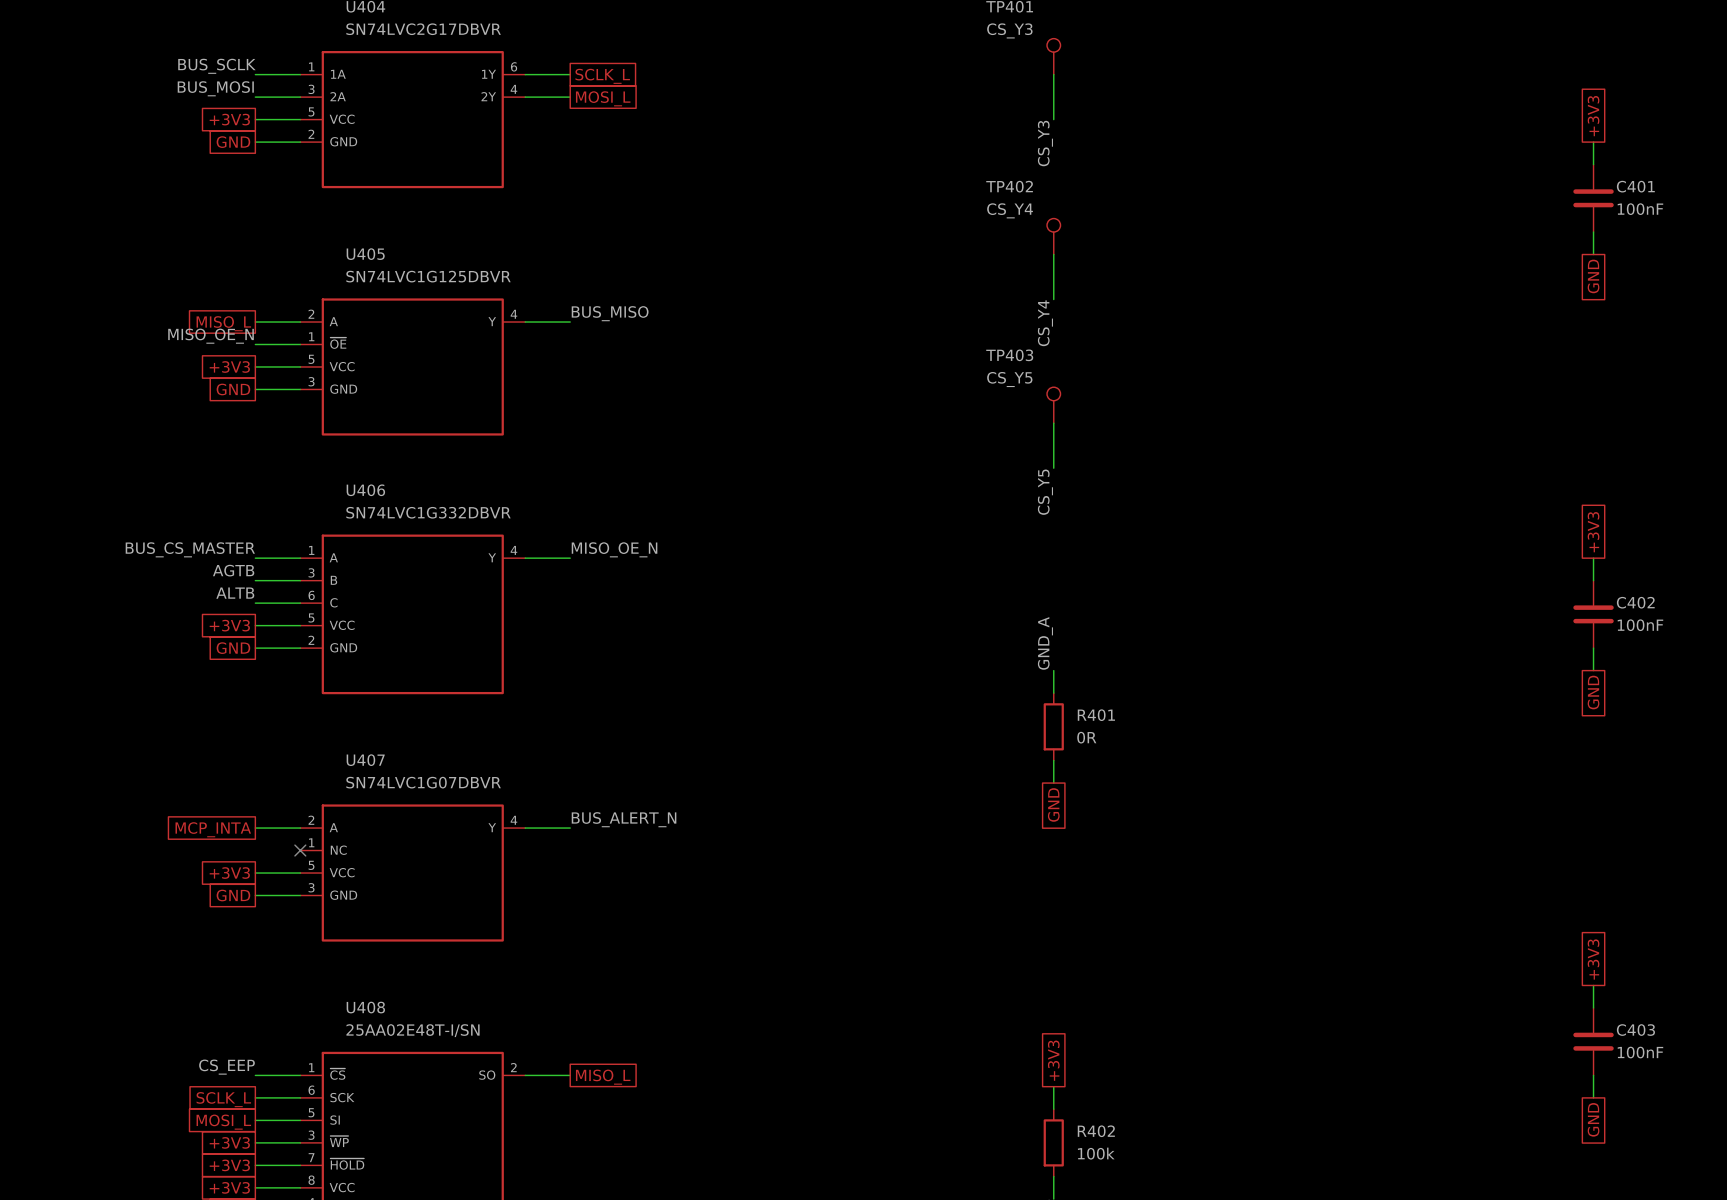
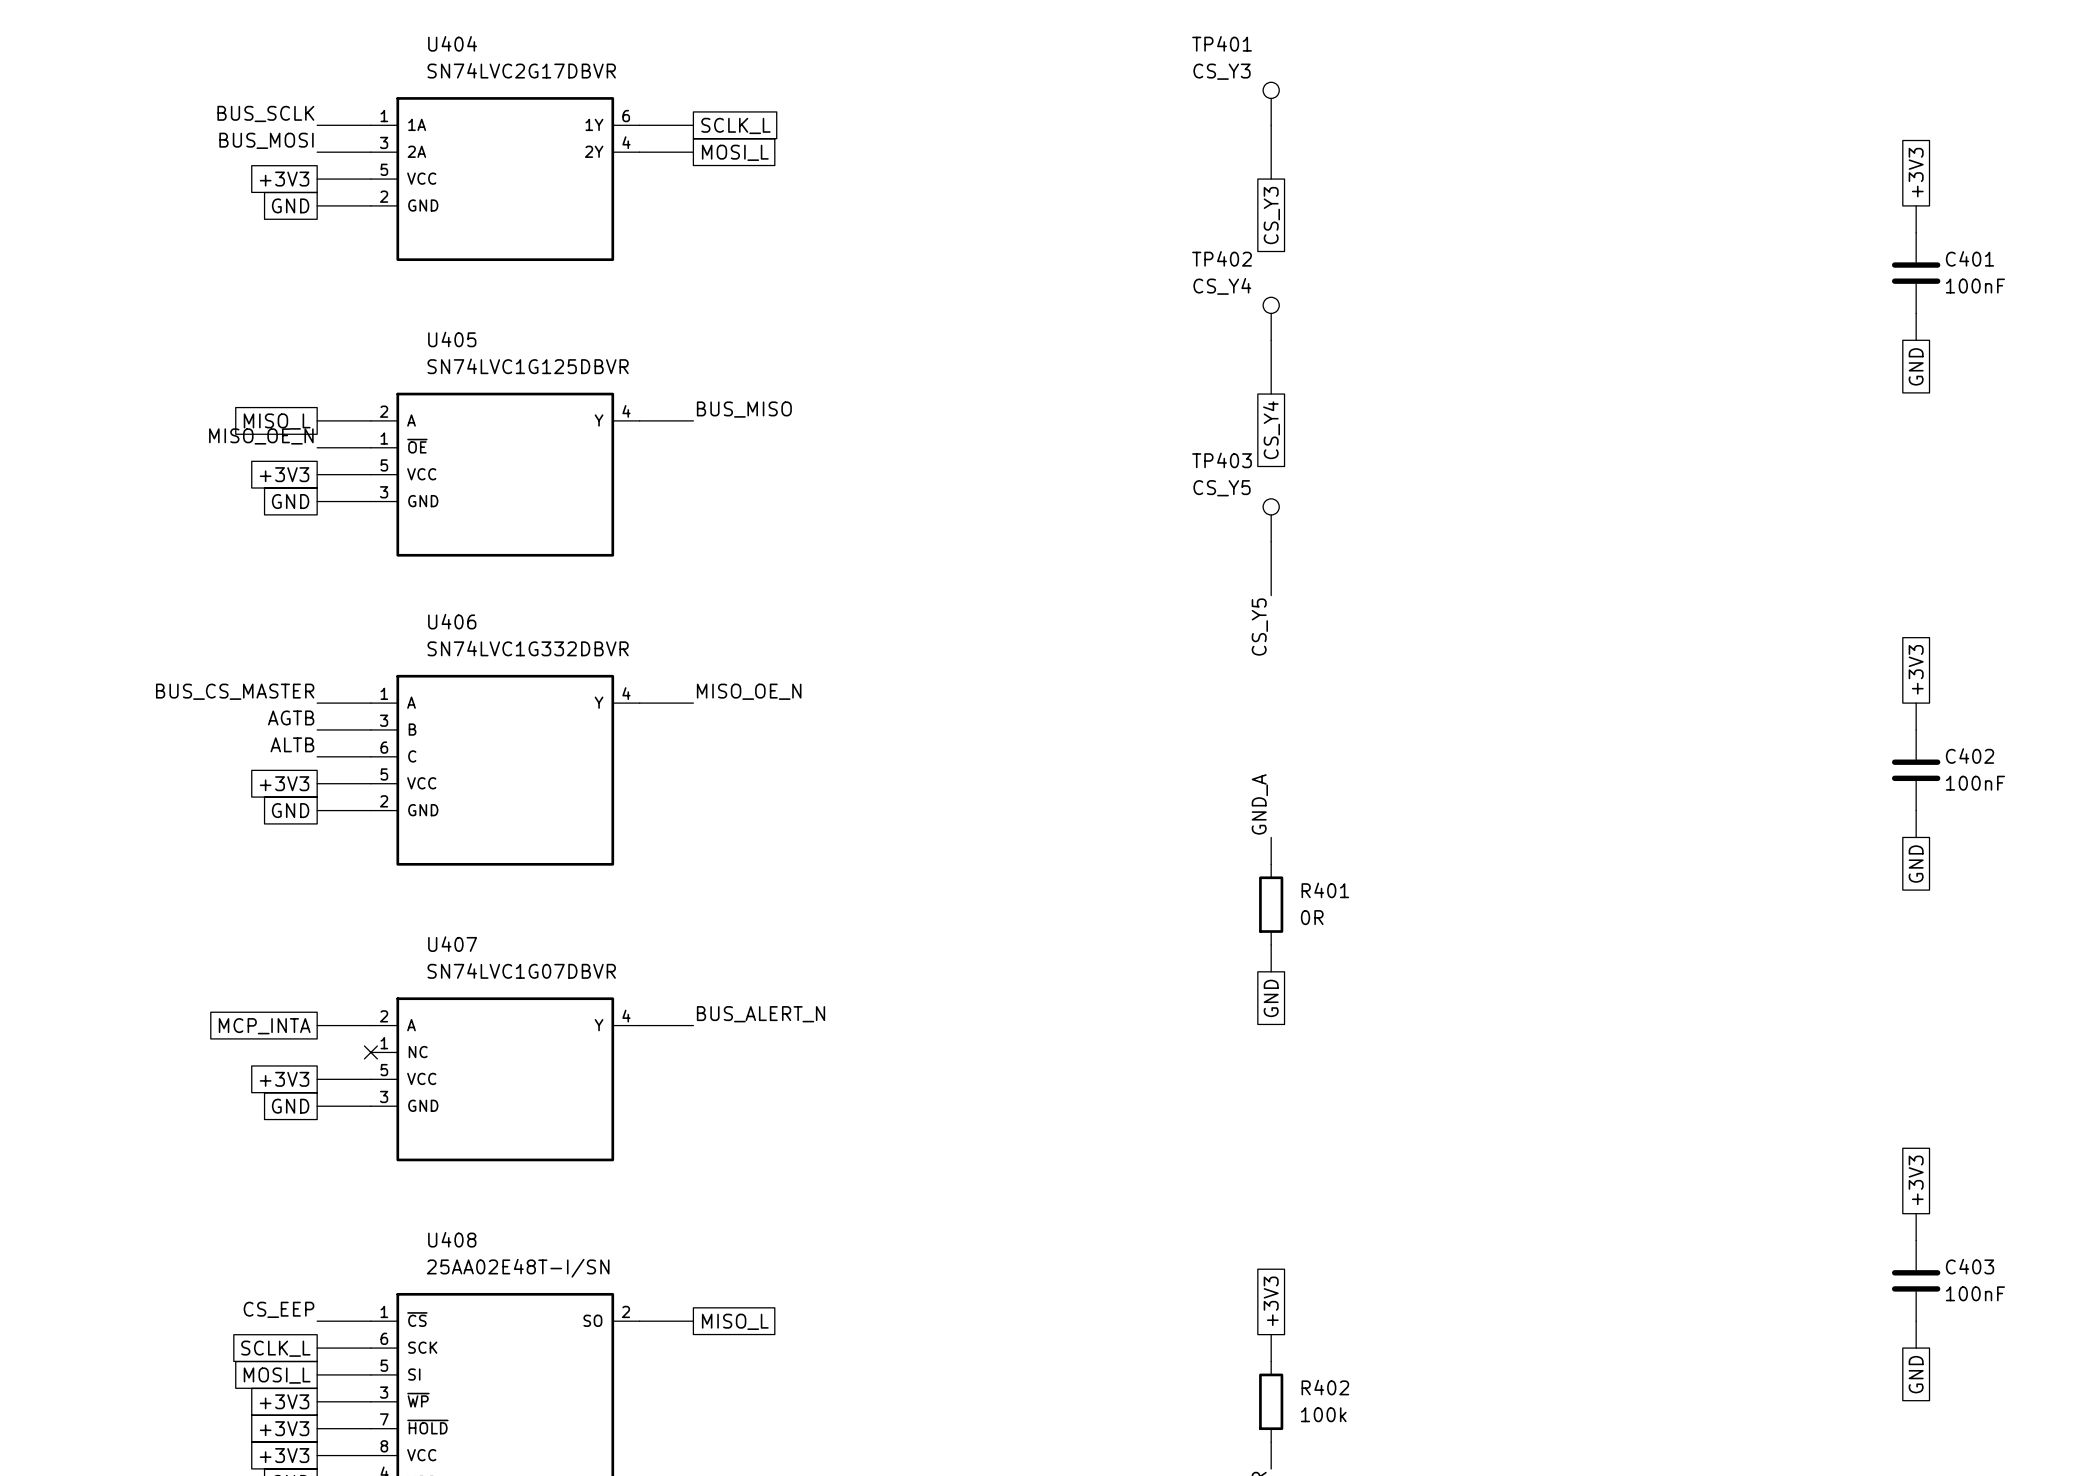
label: CS_Y3 (1045, 143) -> none
global label: none -> CS_Y3 (1271, 215)
label: CS_Y4 (1045, 323) -> none
global label: none -> CS_Y4 (1271, 430)

